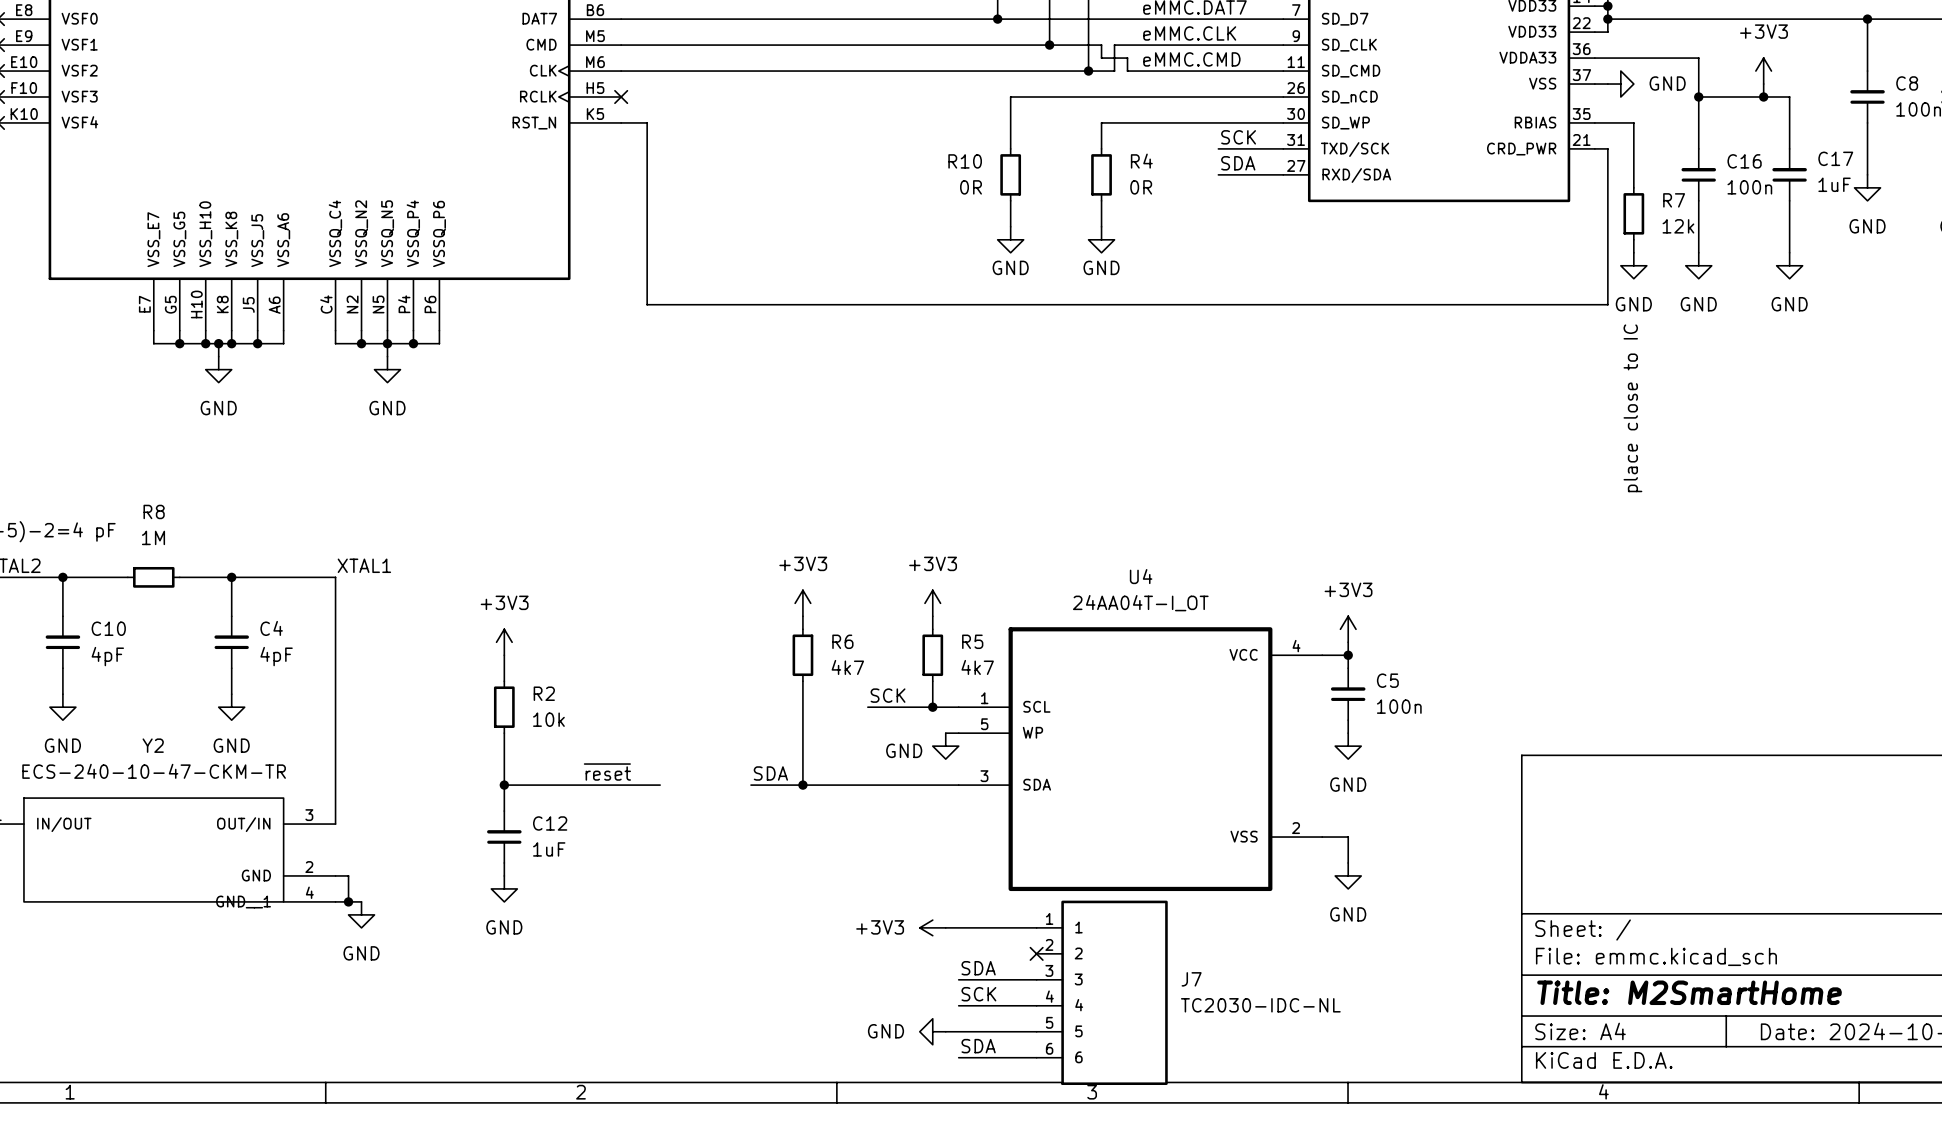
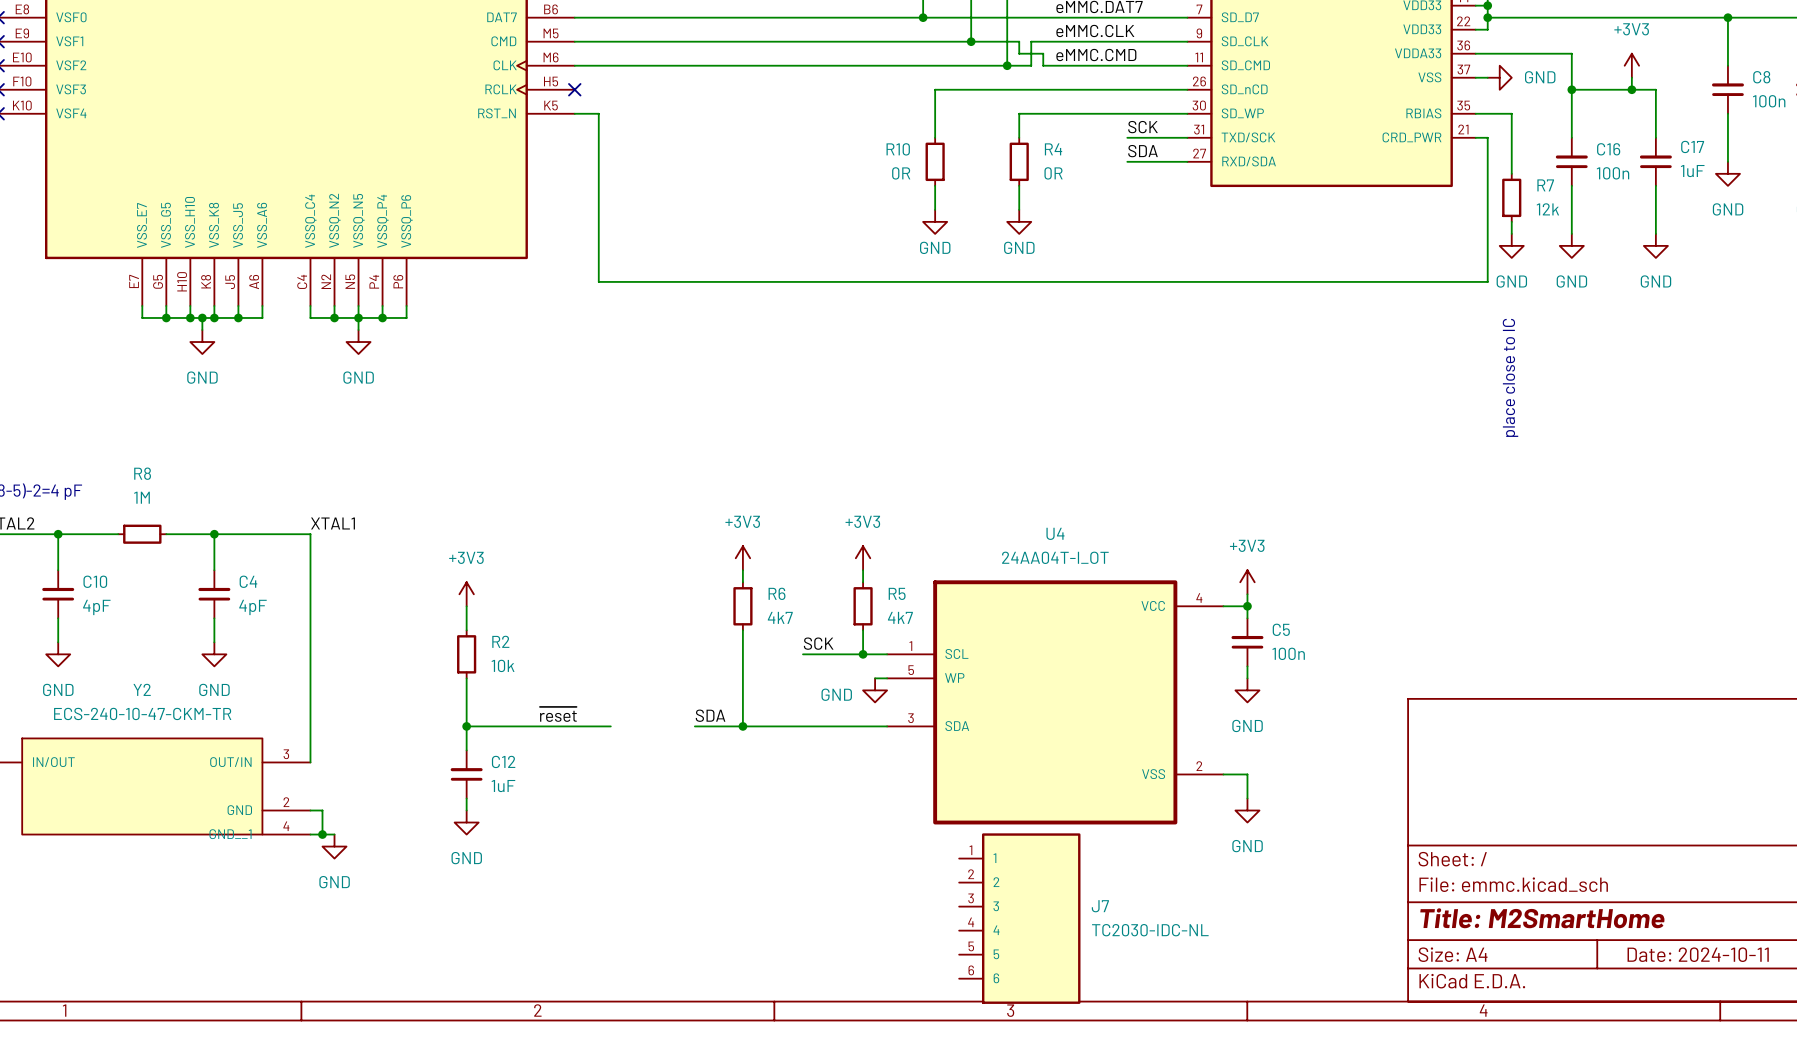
power symbol: +3V3 (932, 927) -> none
wire: (945, 927) (1036, 927) -> none
no-connect mark: (1036, 953) -> none
label: SDA (978, 968) -> none
wire: (958, 979) (1036, 979) -> none
label: SCK (978, 994) -> none
wire: (958, 1005) (1036, 1005) -> none
power symbol: GND (932, 1031) -> none
wire: (945, 1031) (1036, 1031) -> none
label: SDA (978, 1046) -> none
wire: (958, 1057) (1036, 1057) -> none

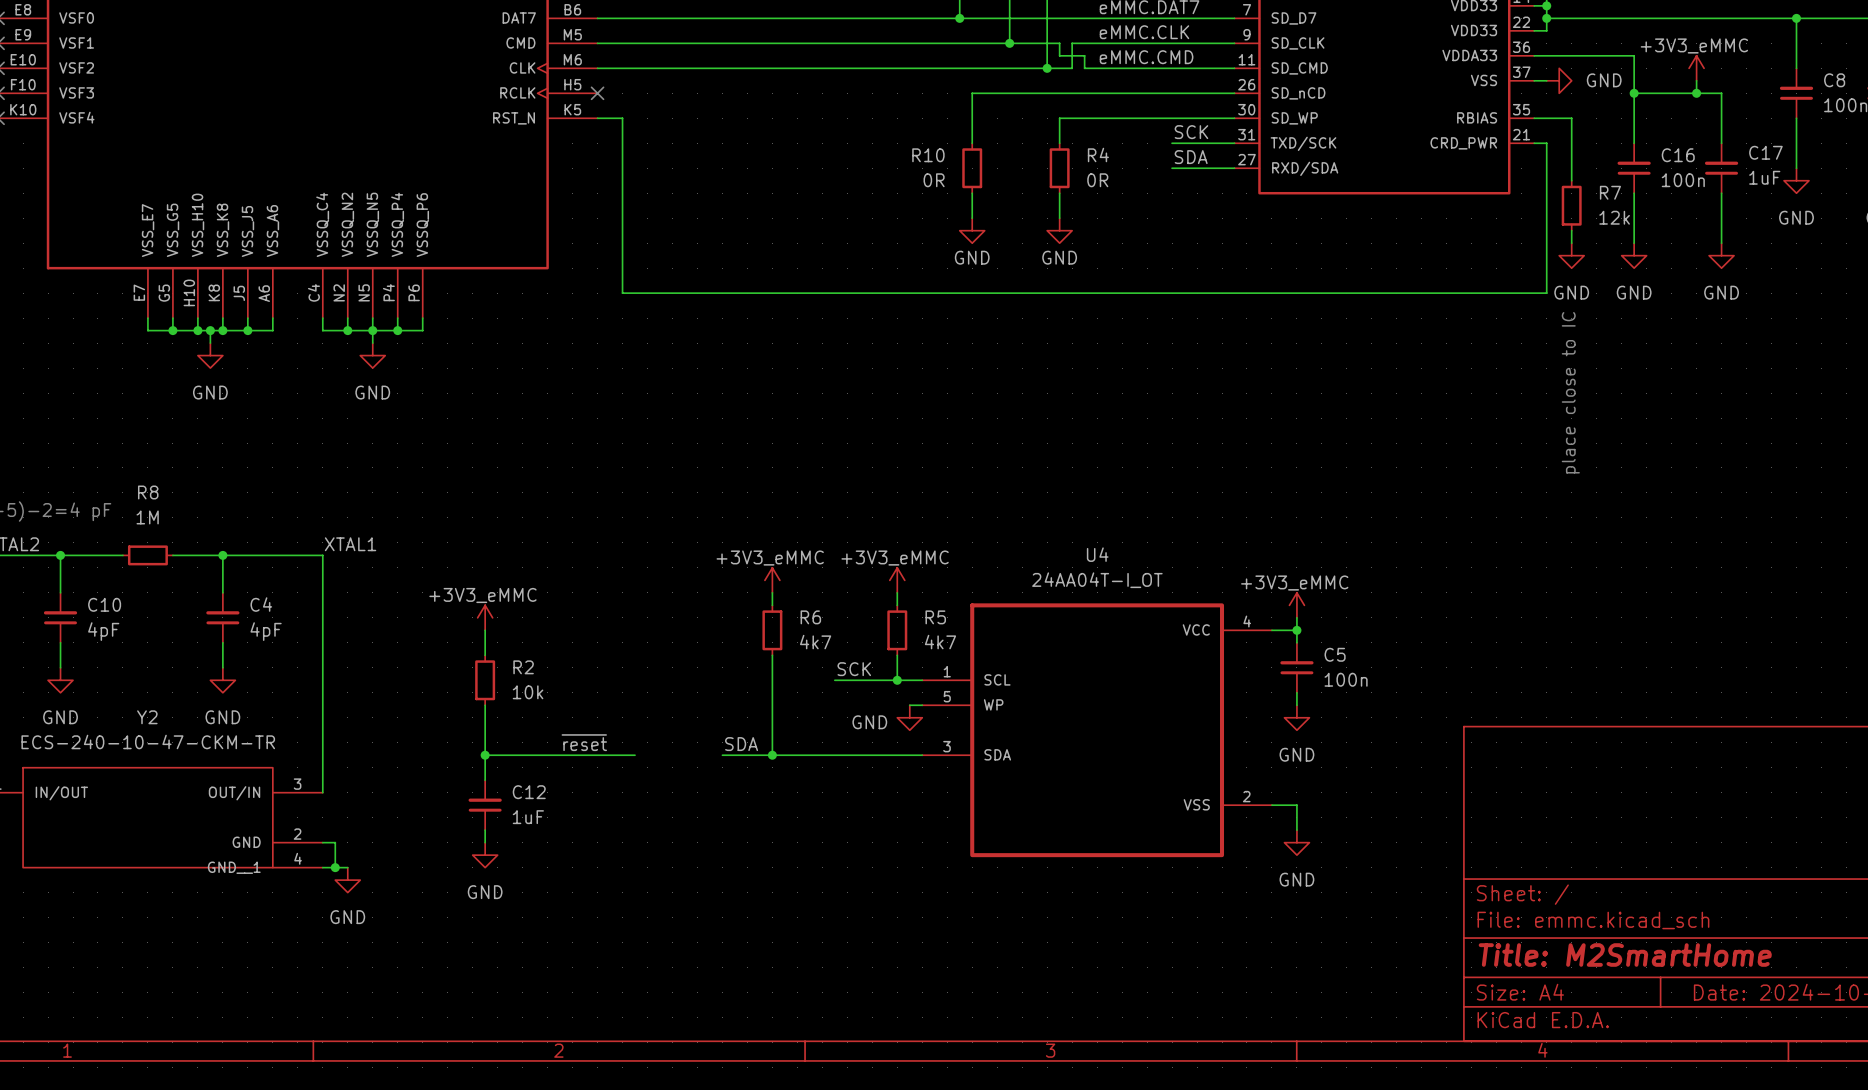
power symbol: +3V3 (1631, 65) -> +3V3_eMMC (1696, 68)
power symbol: +3V3 (742, 558) -> +3V3_eMMC (772, 580)
power symbol: +3V3 (863, 558) -> +3V3_eMMC (897, 580)
power symbol: +3V3 (1247, 582) -> +3V3_eMMC (1296, 605)
power symbol: +3V3 (466, 594) -> +3V3_eMMC (485, 617)
J7: TC2030-IDC-NL (1019, 918) -> none

